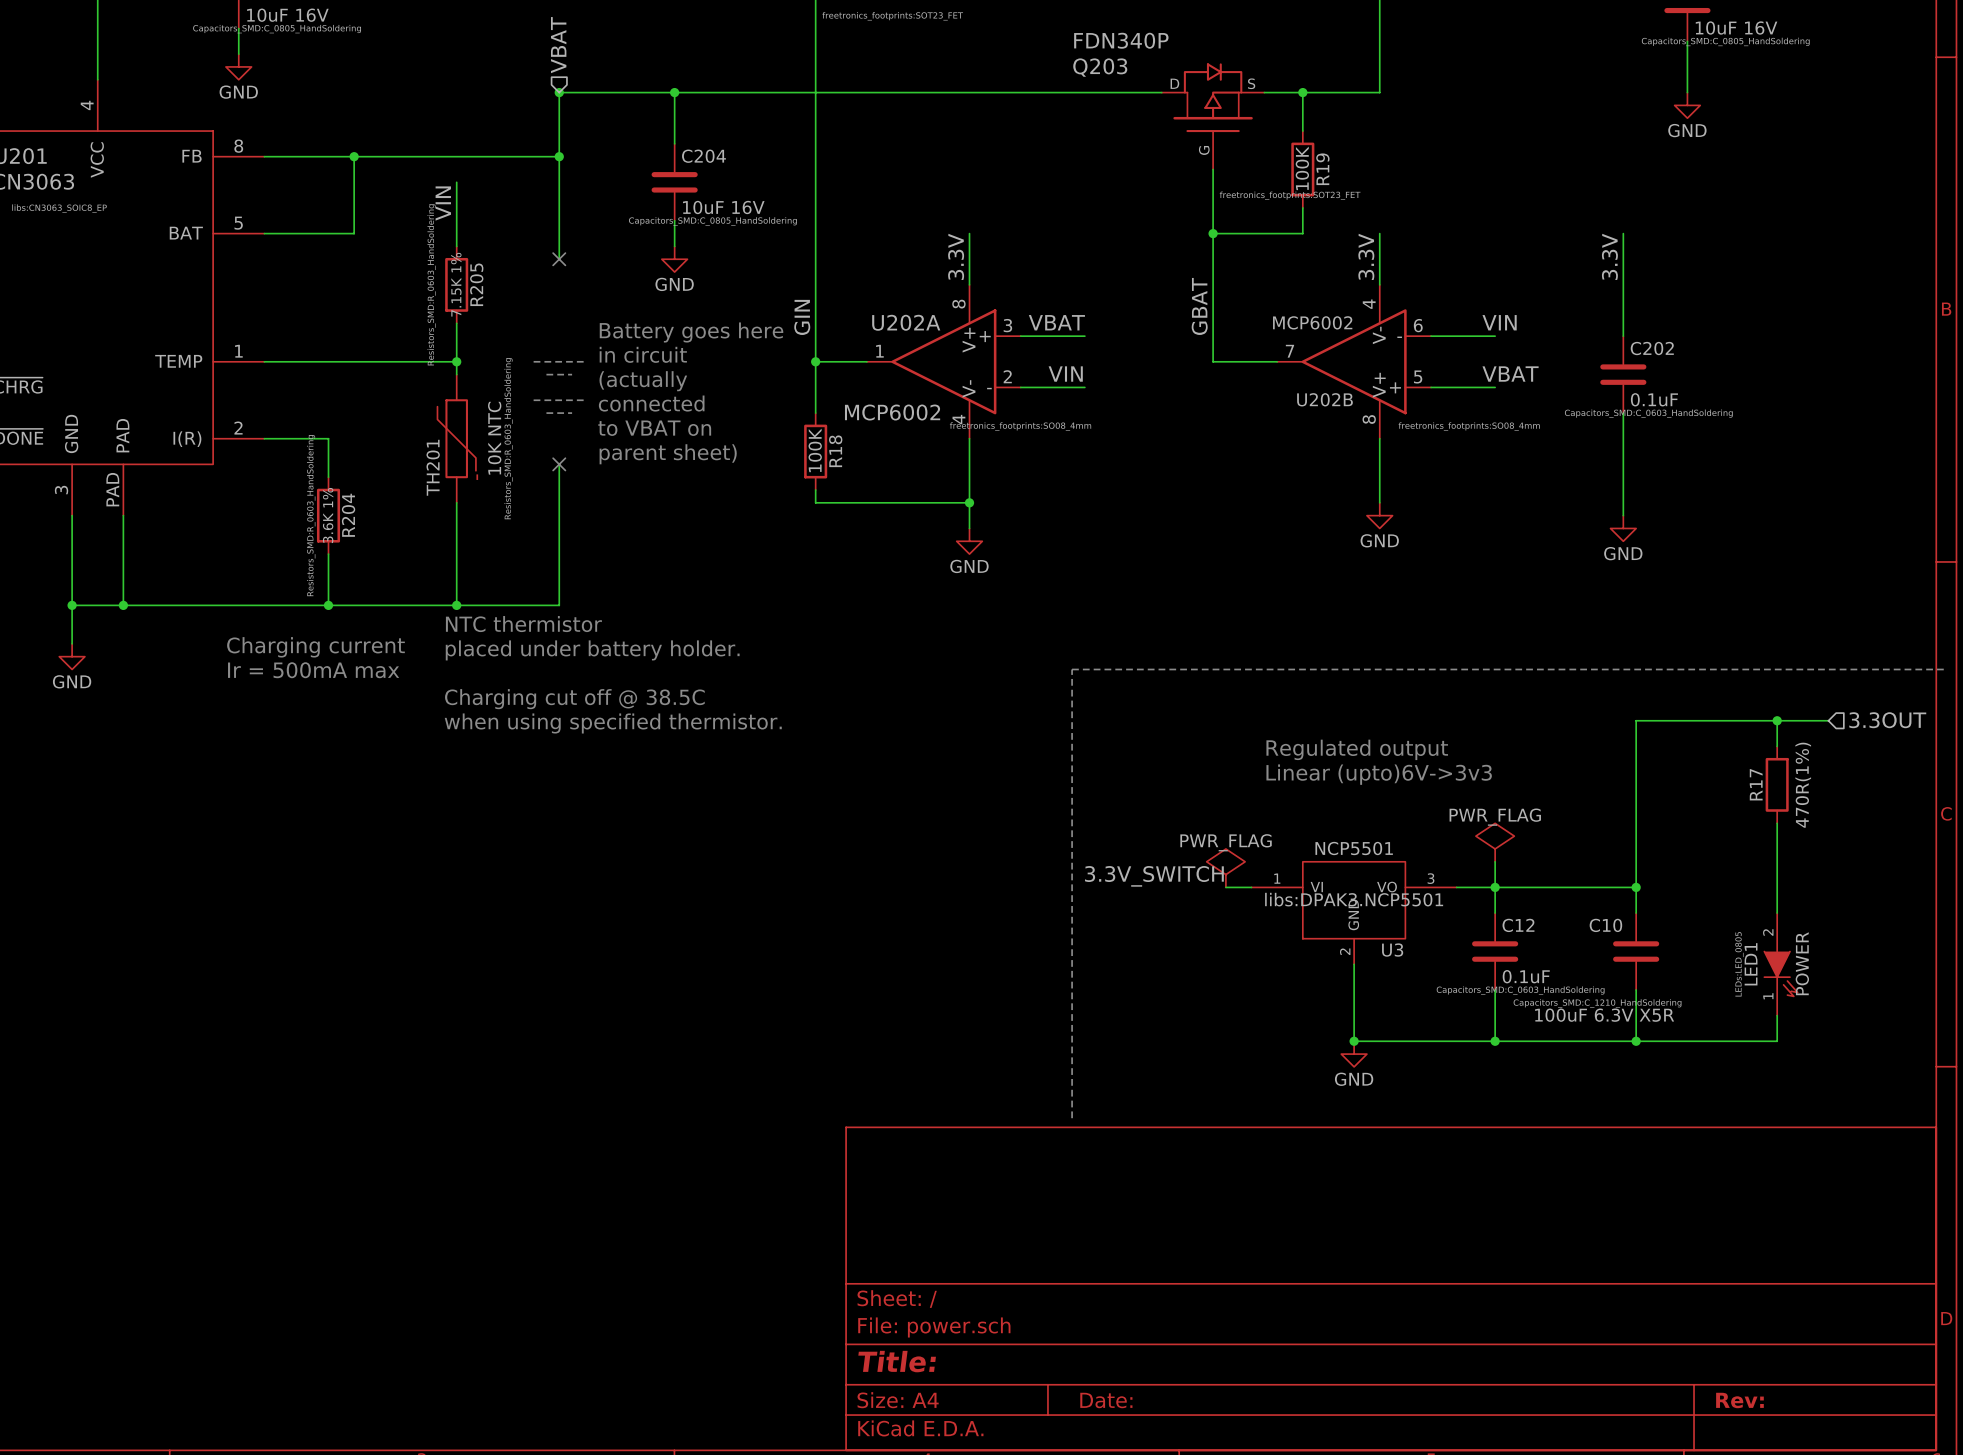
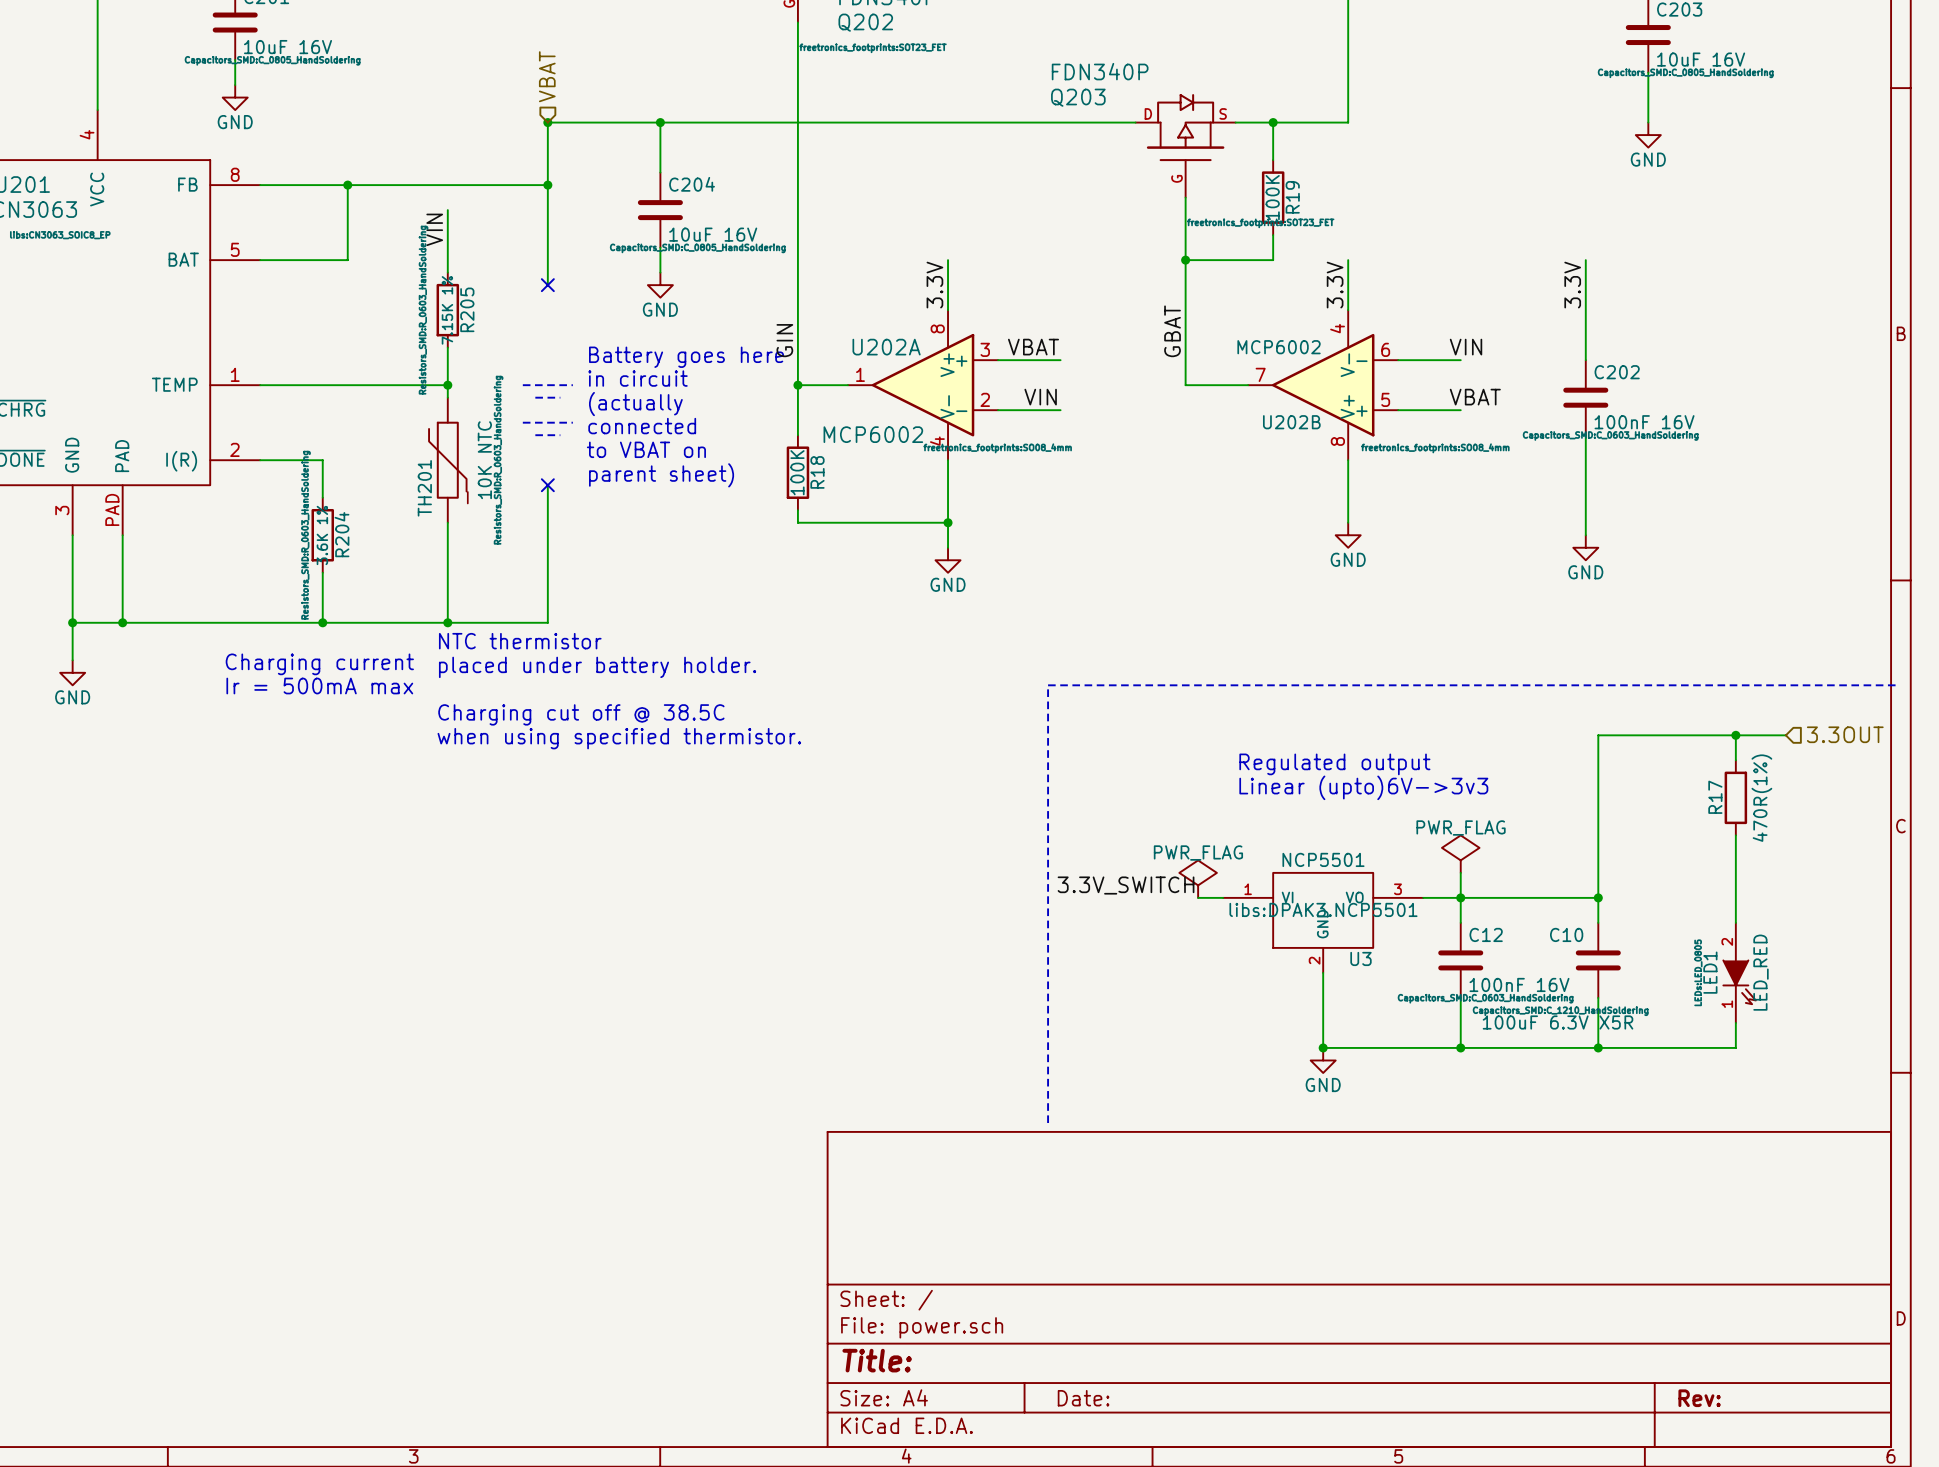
C202 value: 0.1uF (1654, 399) -> 100nF 16V (1644, 422)
LED1 value: POWER (1802, 963) -> LED_RED (1761, 972)
C12 value: 0.1uF (1526, 976) -> 100nF 16V (1519, 984)

